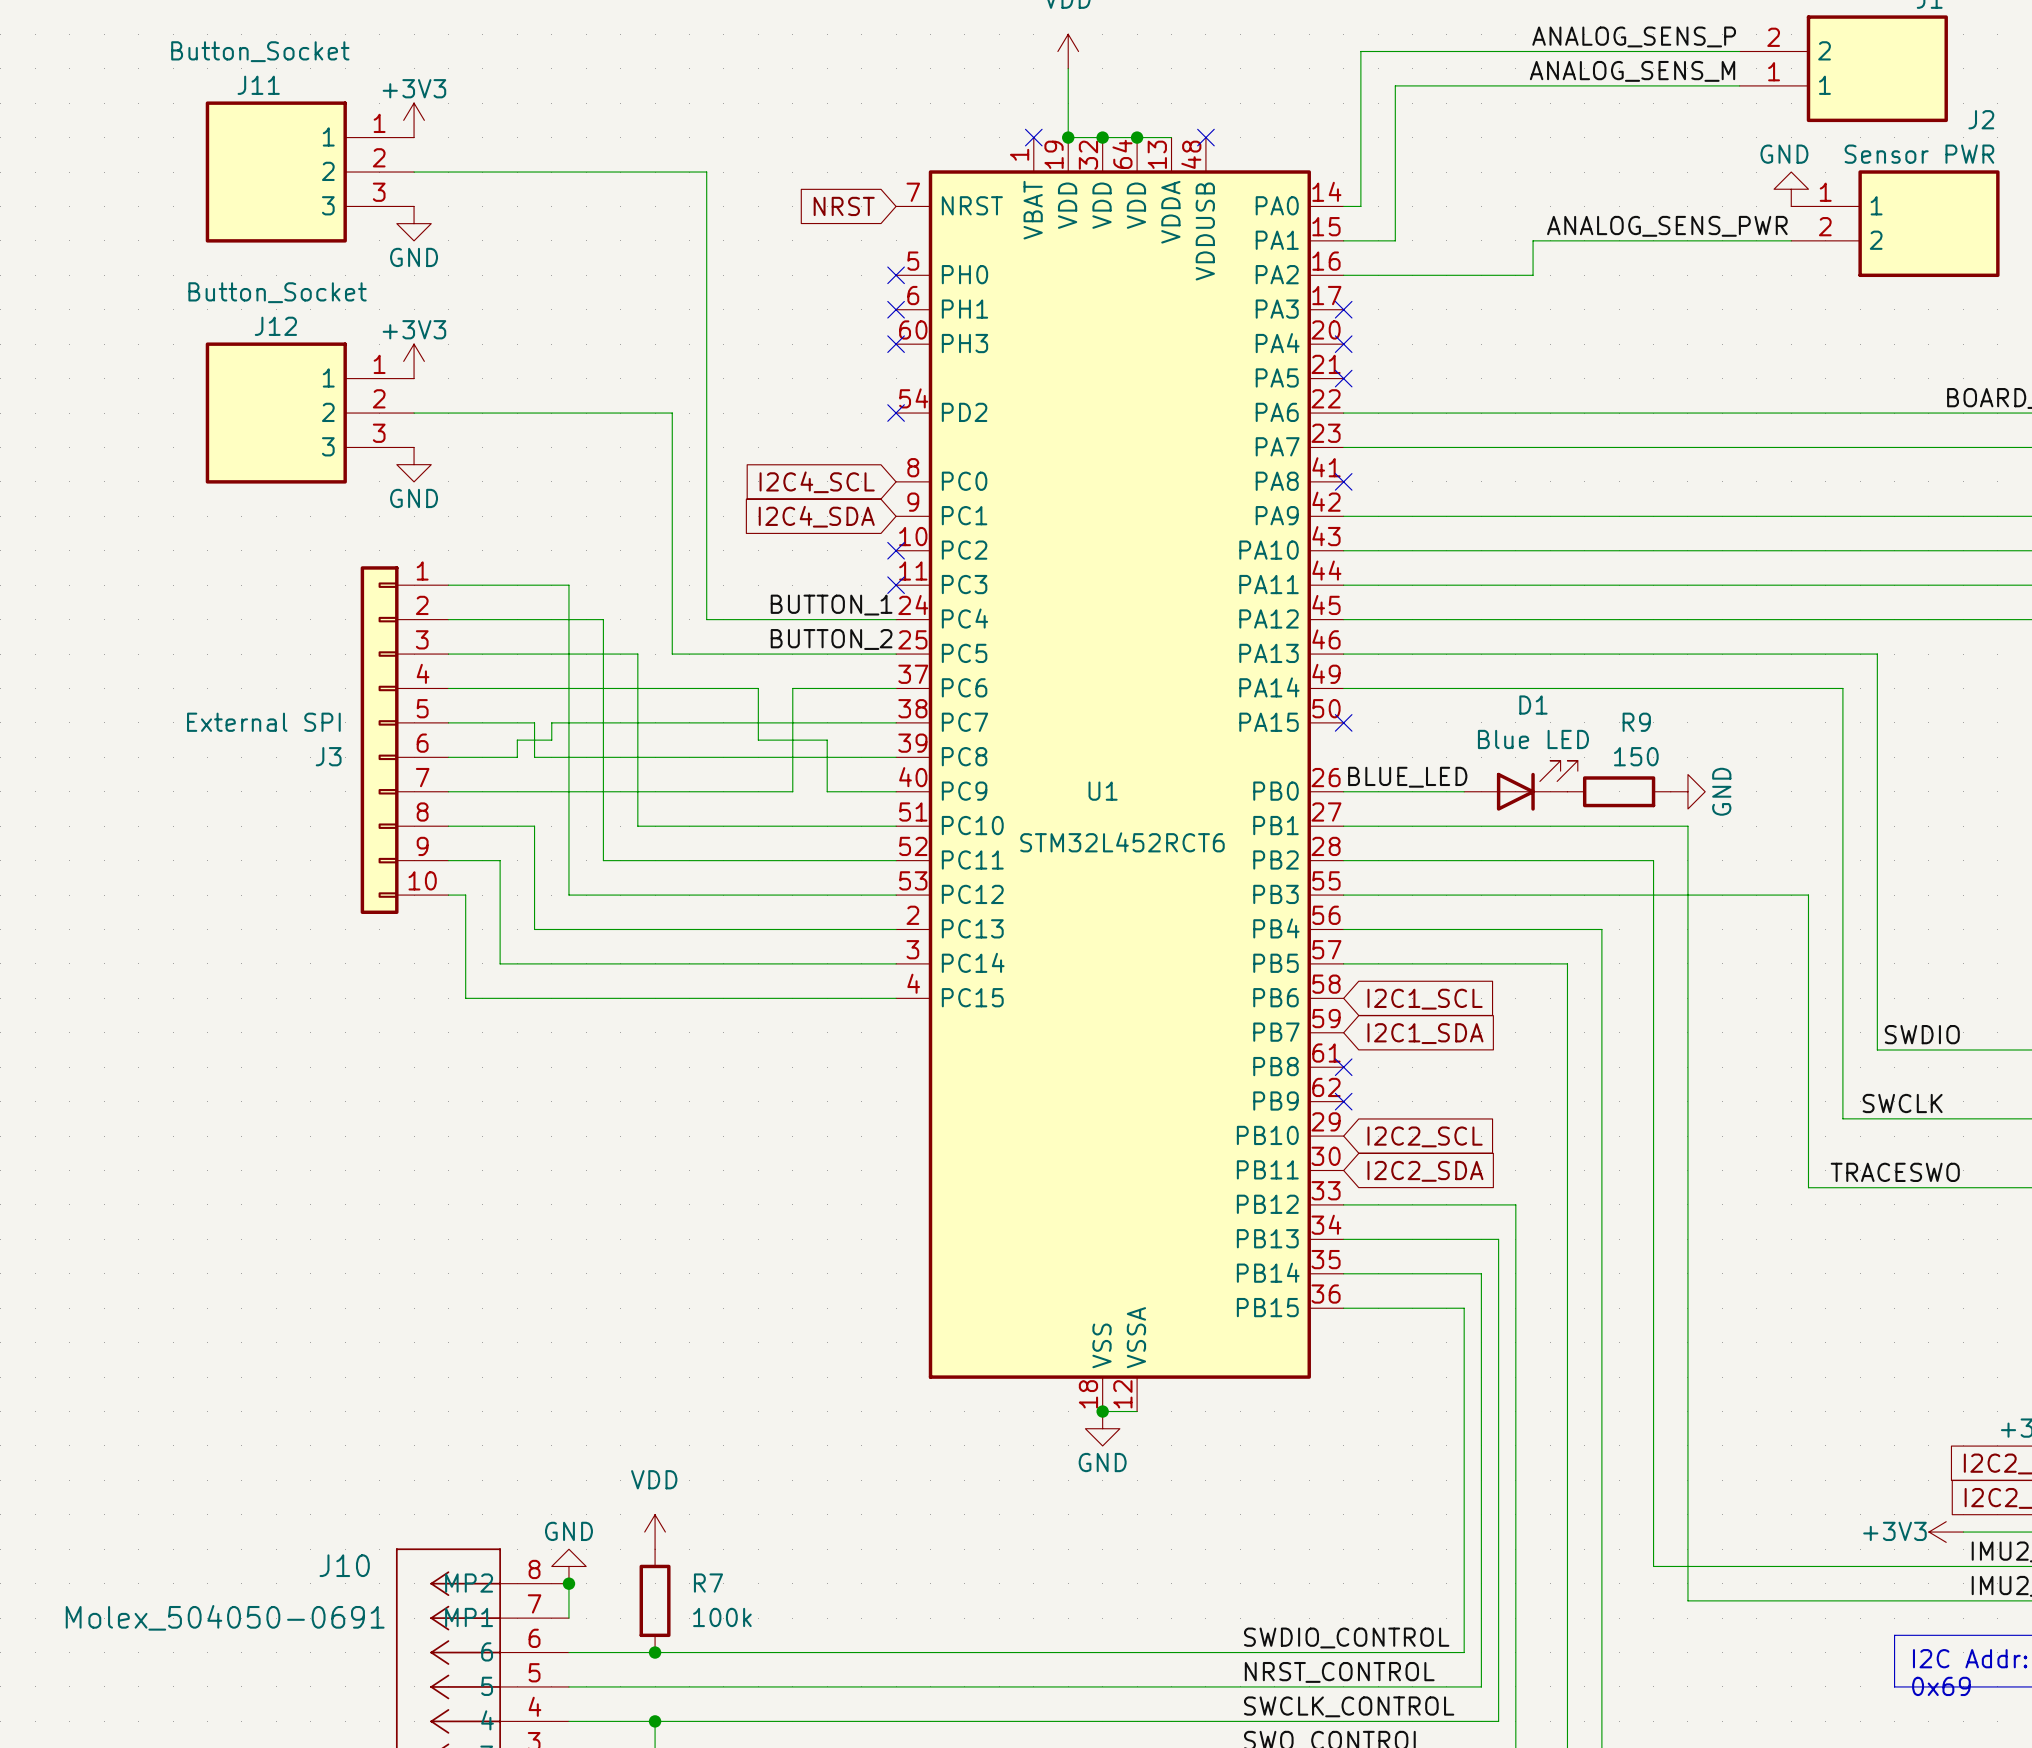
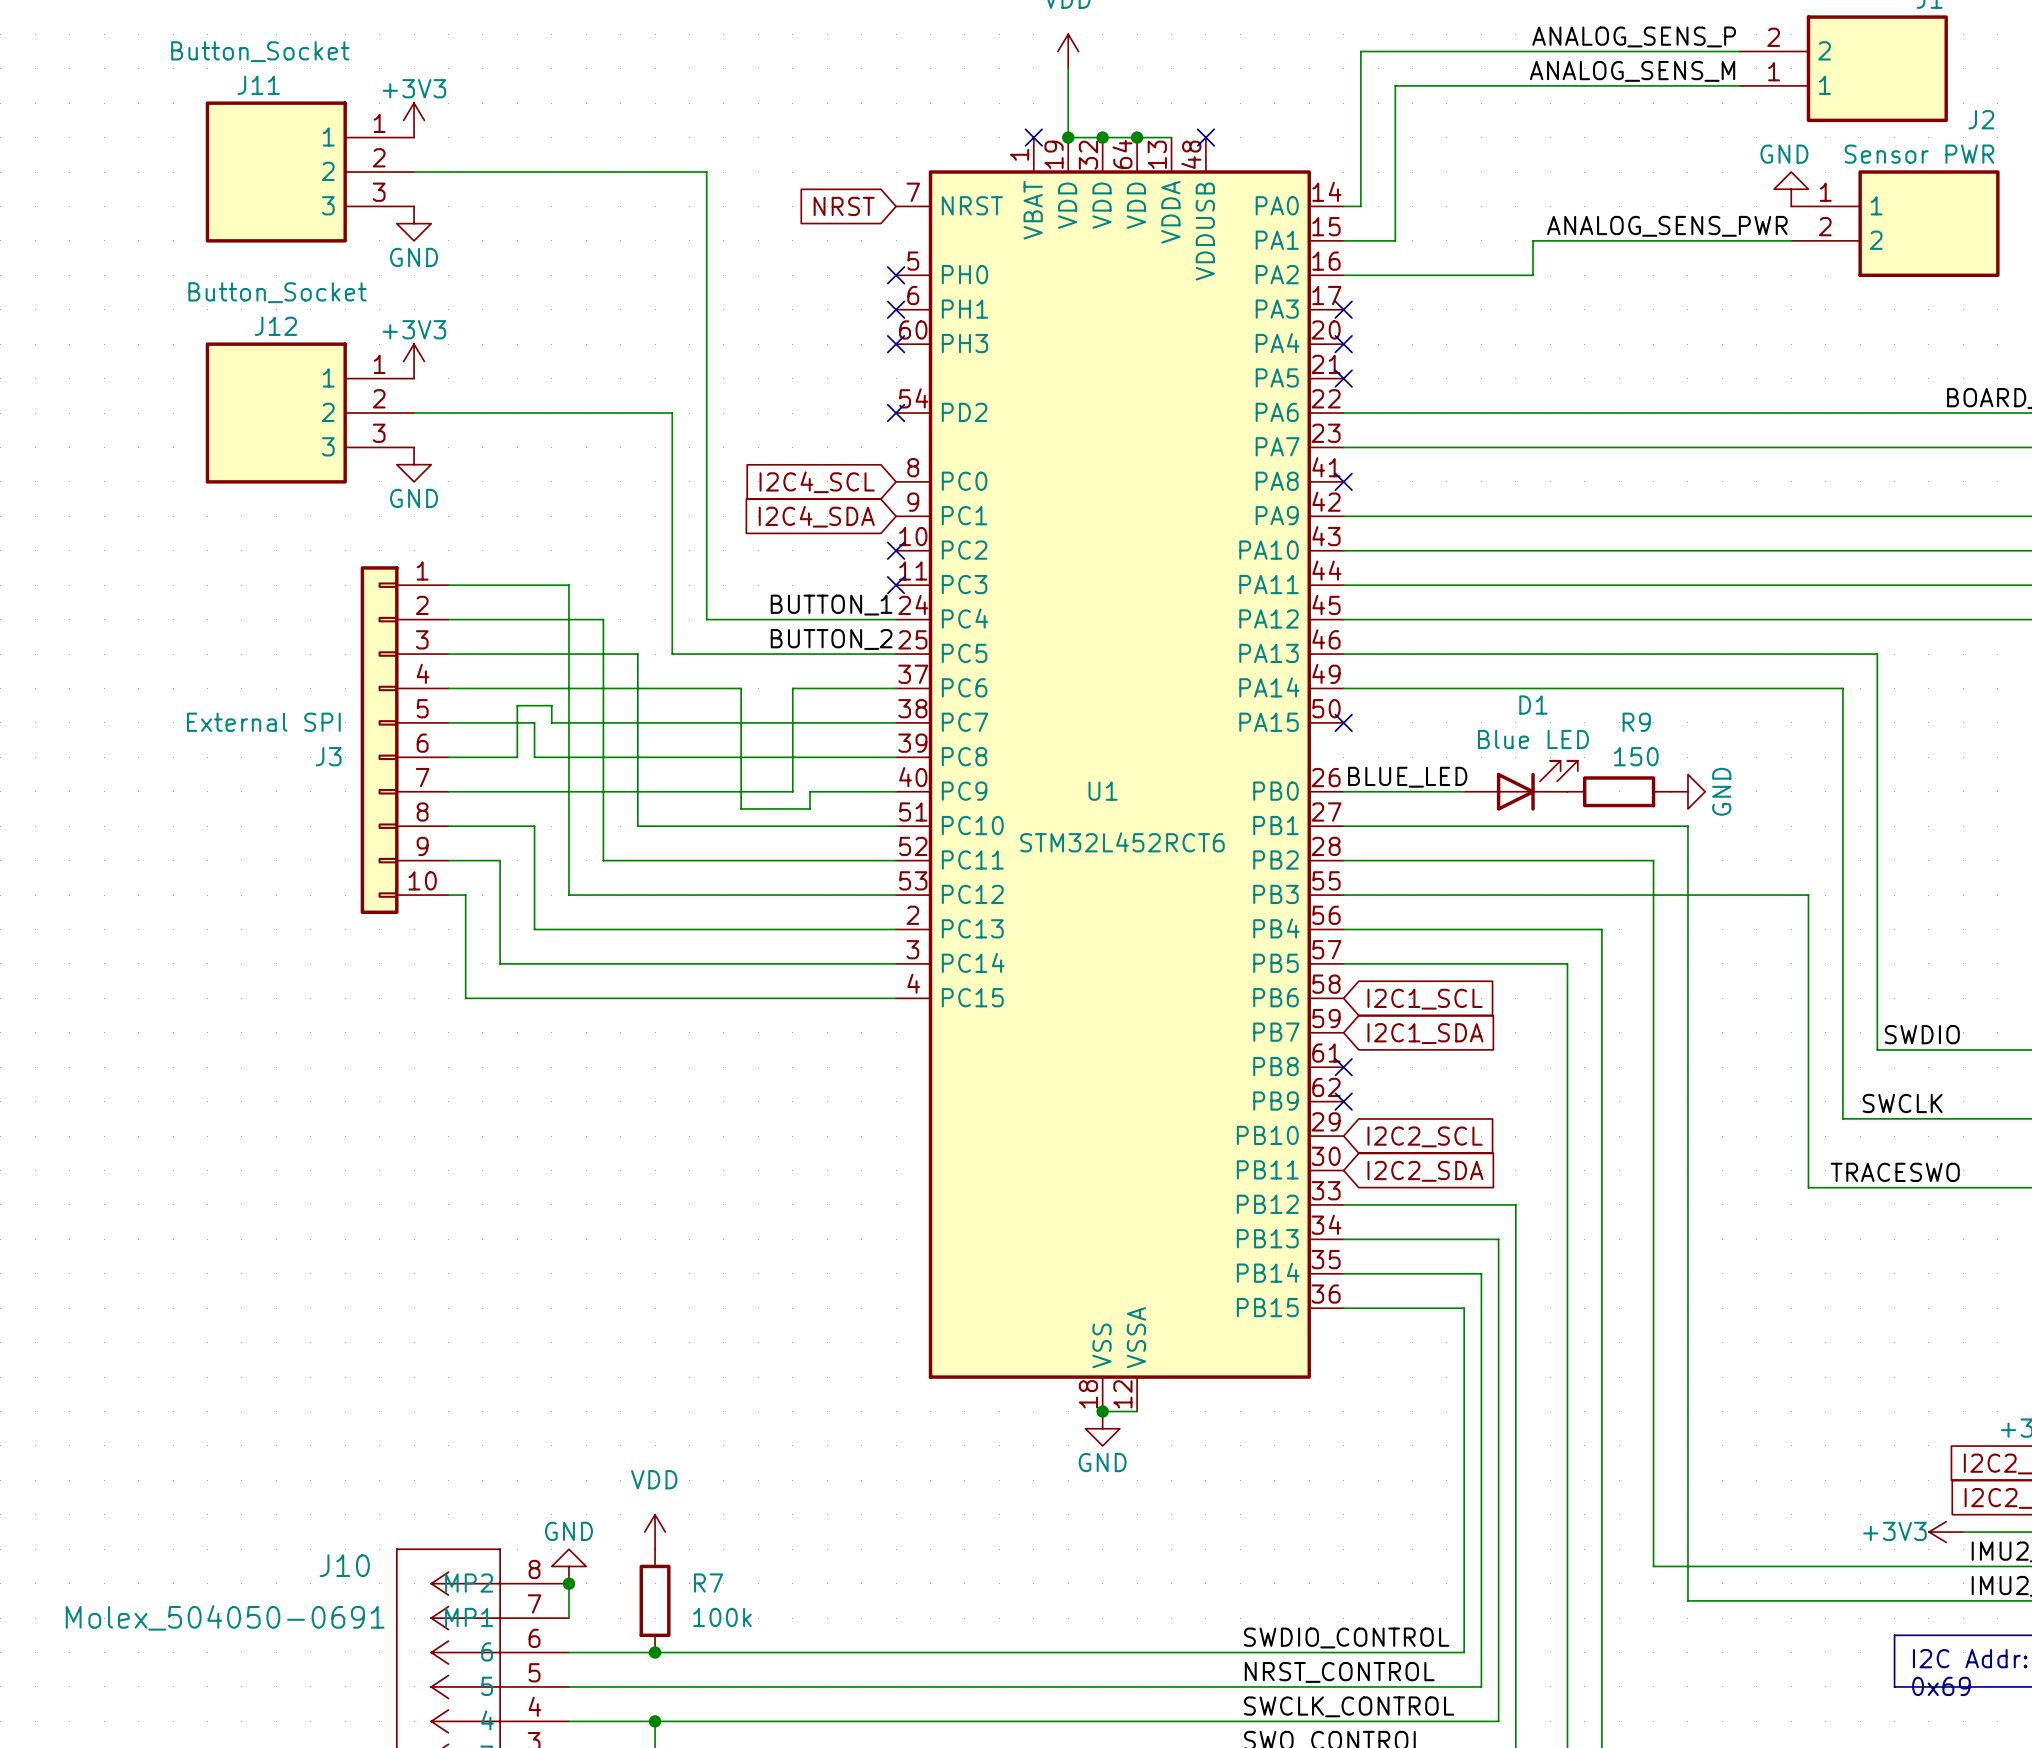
wire: (741, 688) (758, 688) (758, 740) (827, 740) (827, 791) -> (741, 688) (741, 808) (809, 808) (809, 791) (827, 791)
wire: (551, 722) (551, 740) (517, 740) -> (551, 722) (551, 705) (517, 705) (517, 740)

